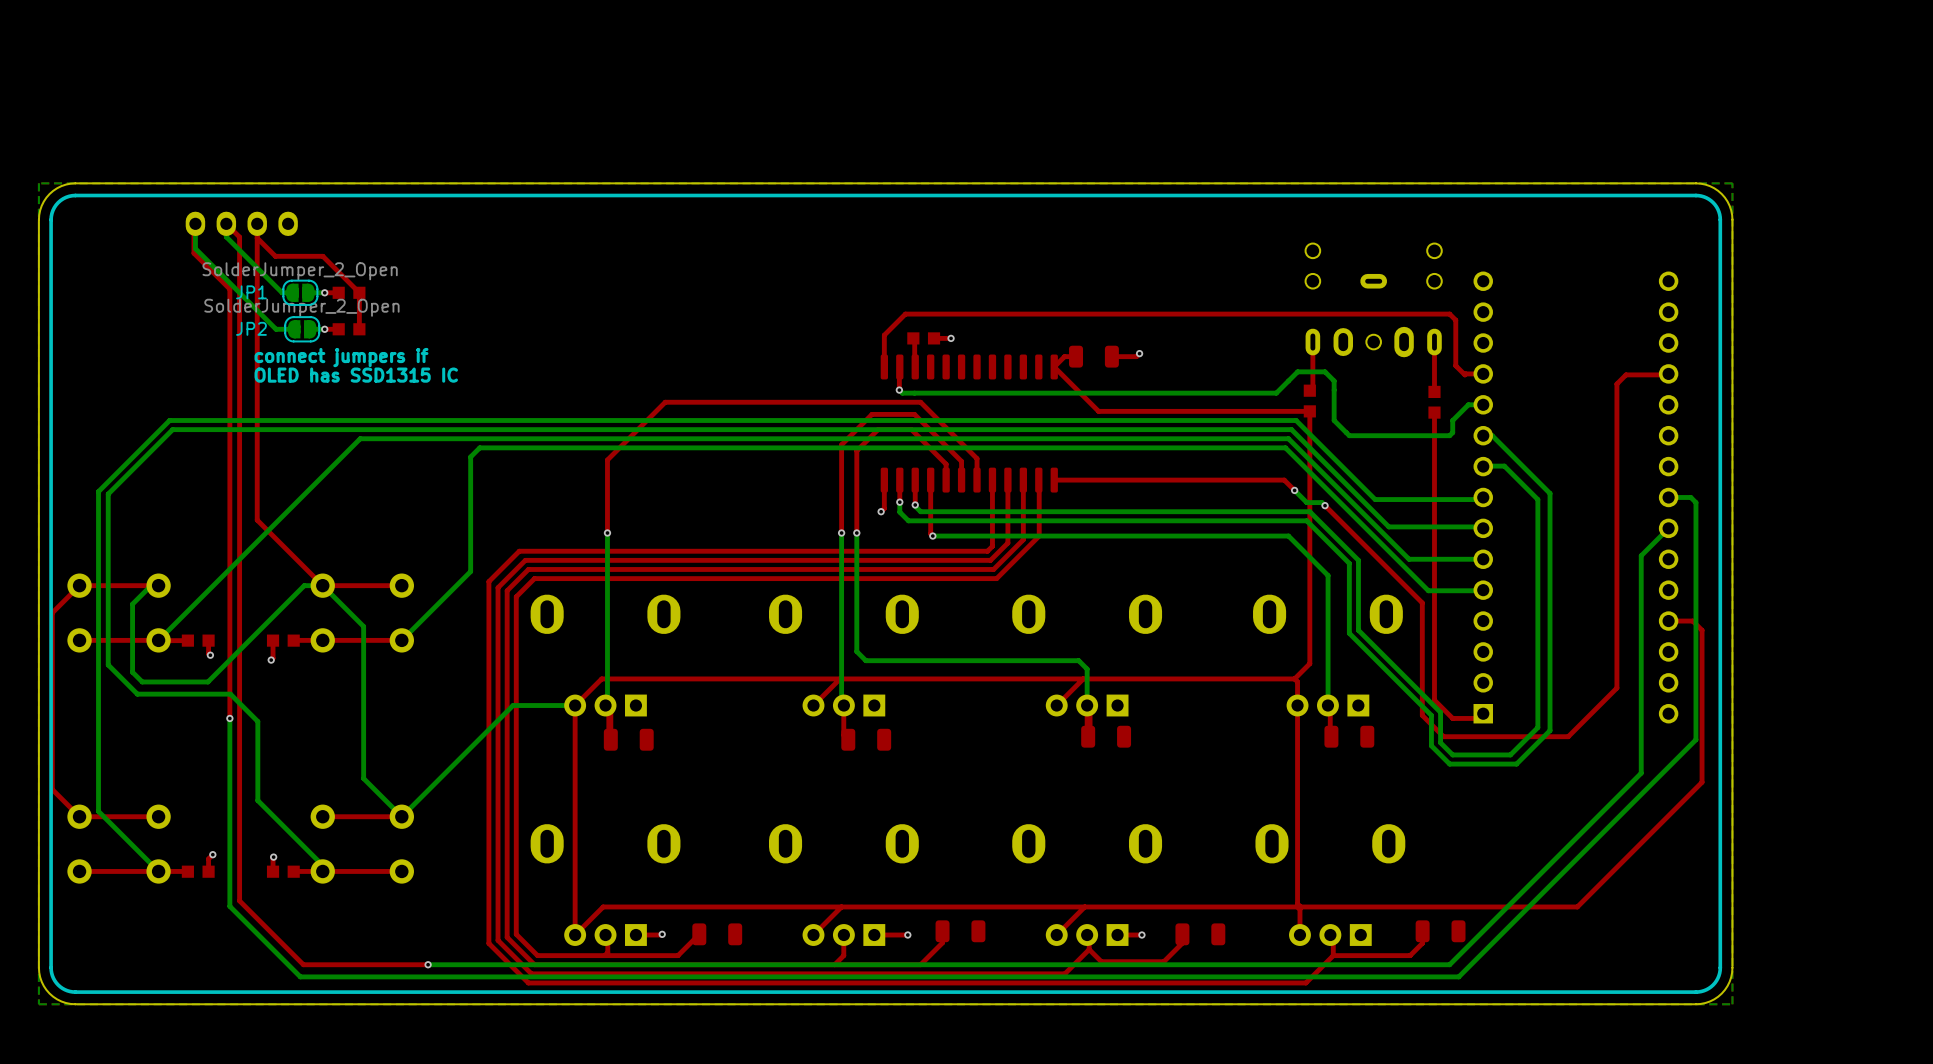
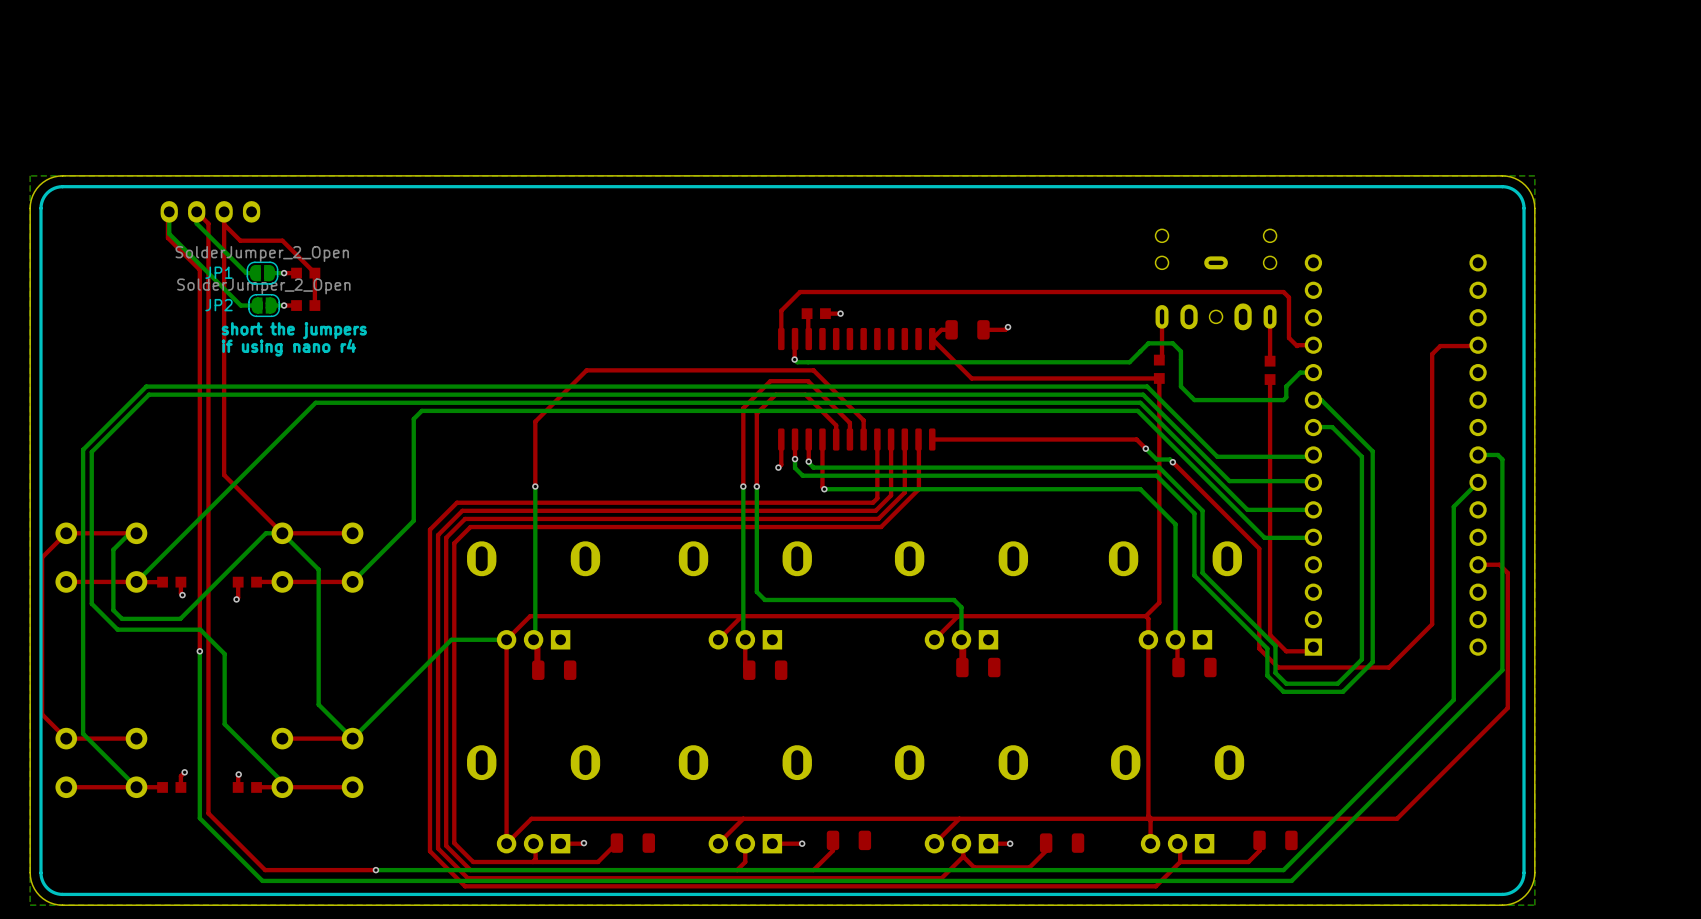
text: connect jumpers if (341, 357) -> short the jumpers (294, 330)
text: OLED has SSD1315 IC (356, 375) -> if using nano r4 (288, 347)

